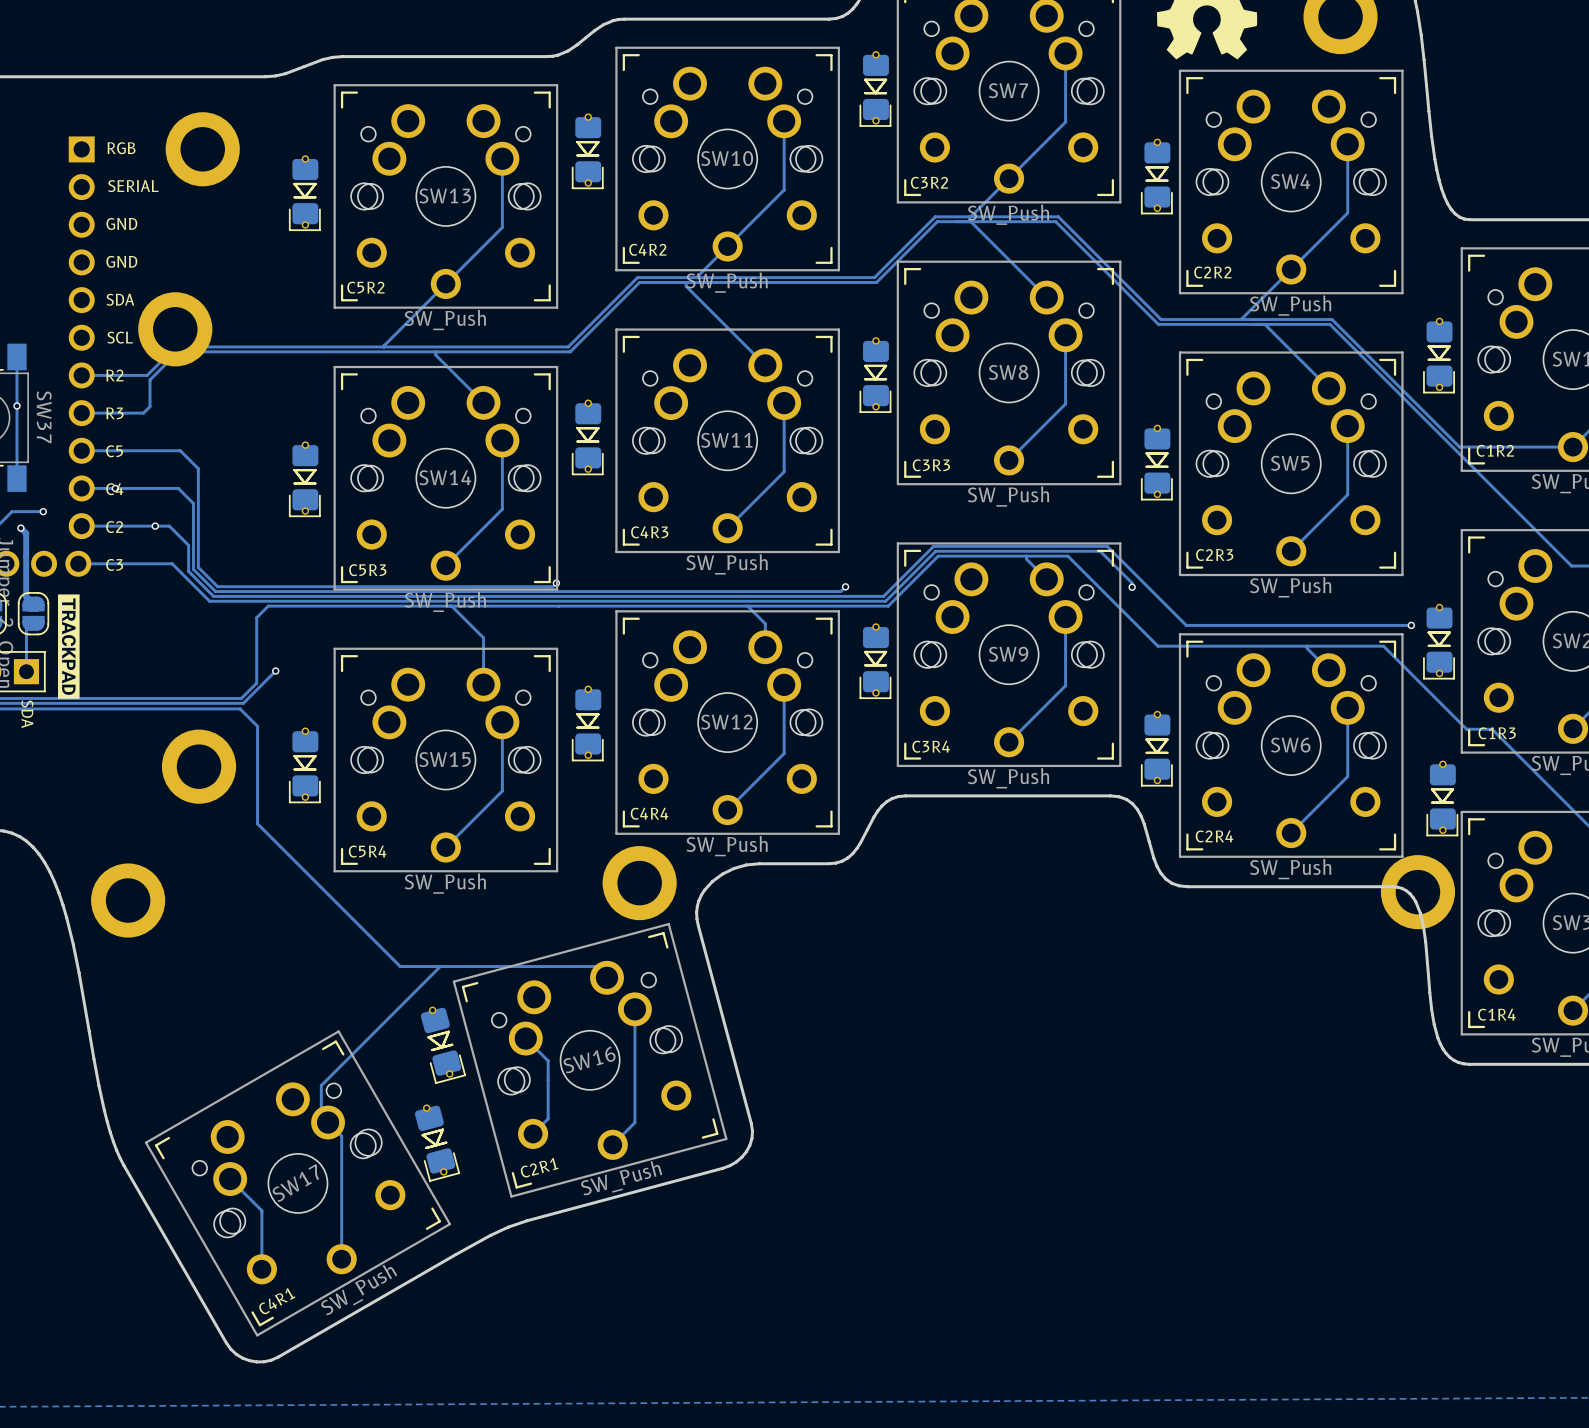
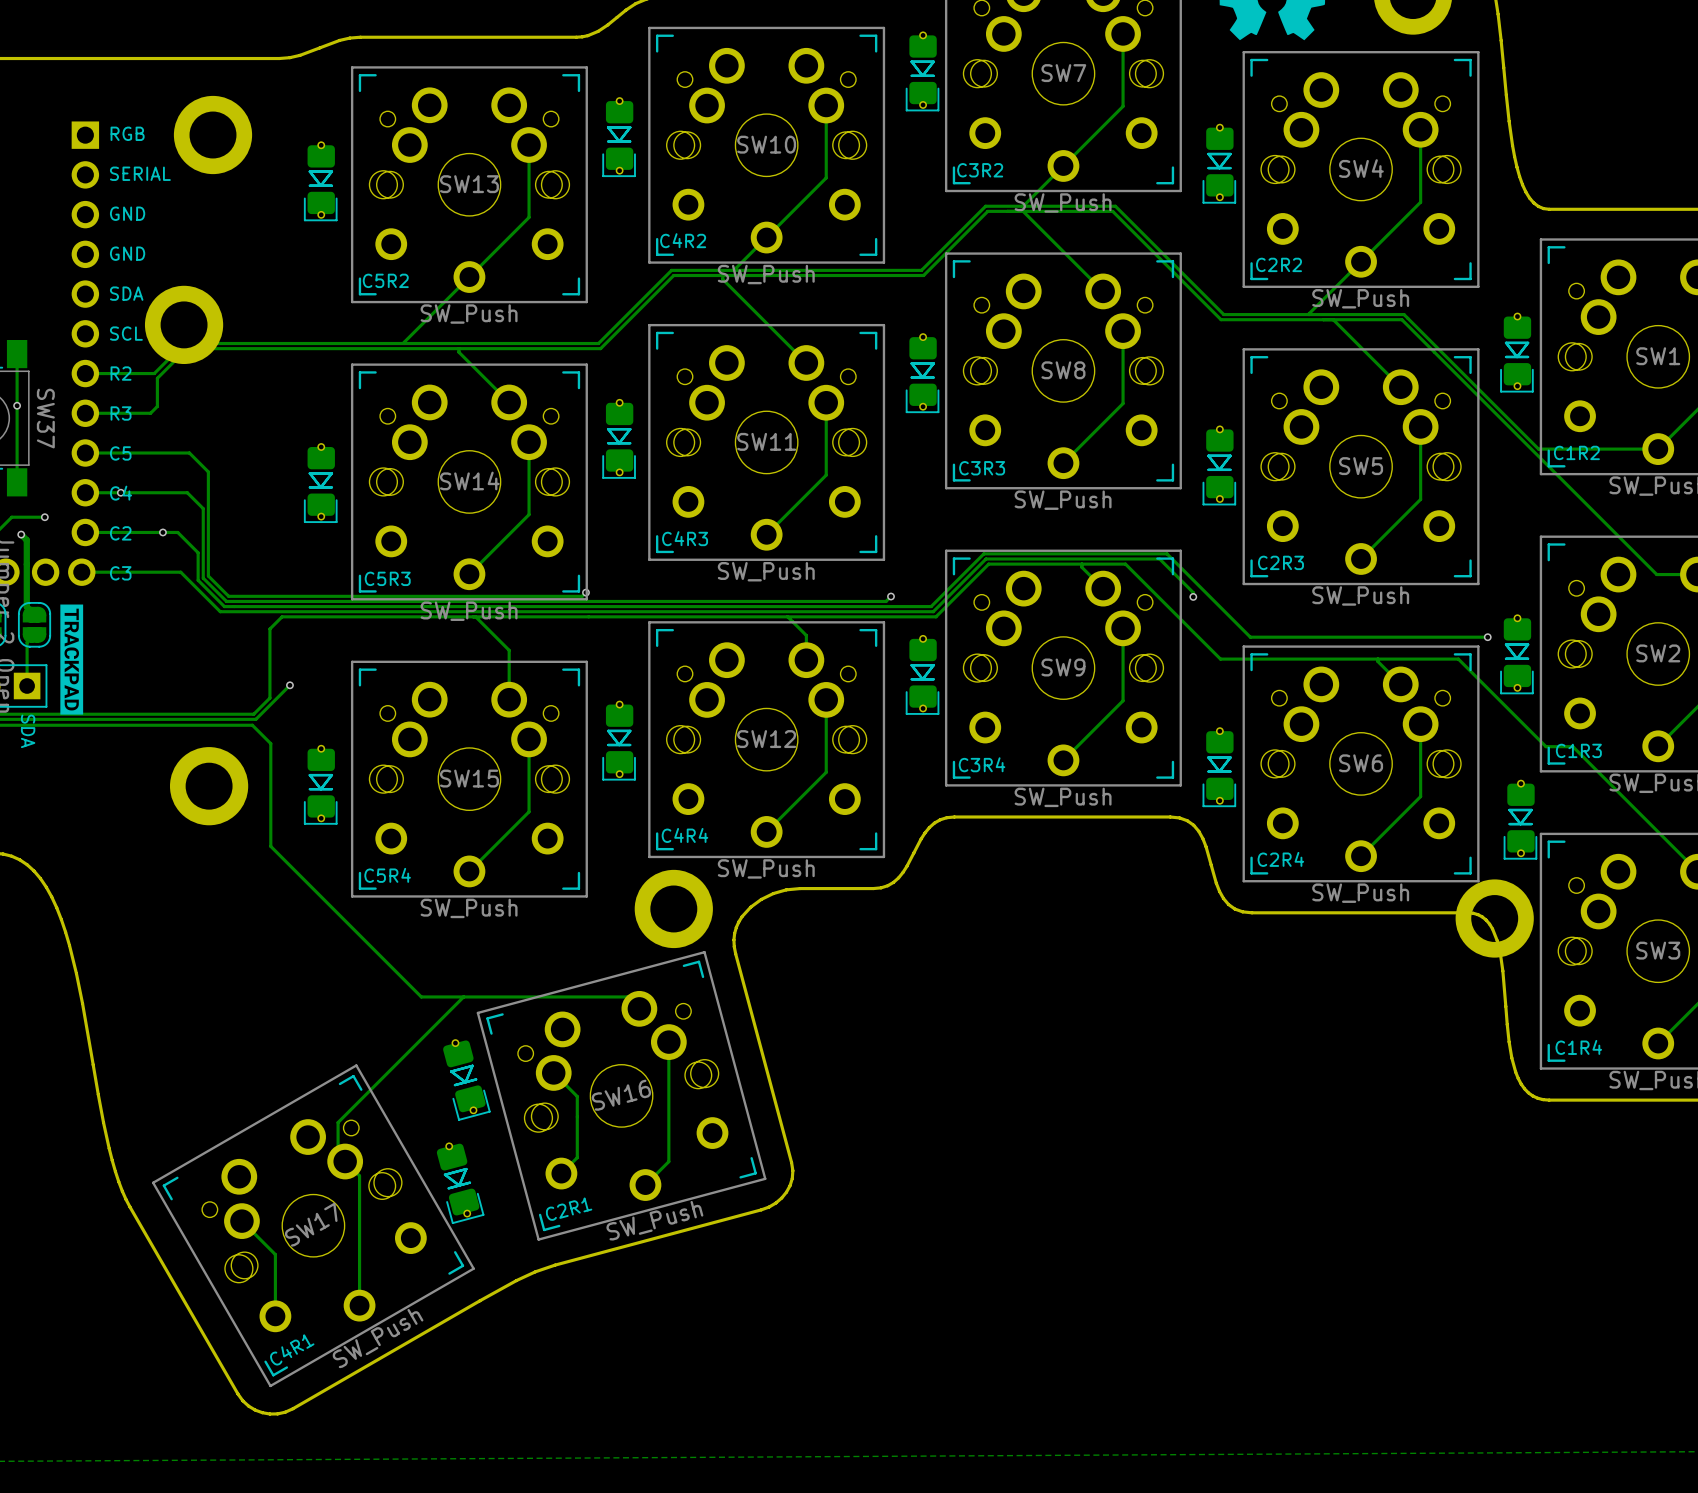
part: (128, 900) -> none

